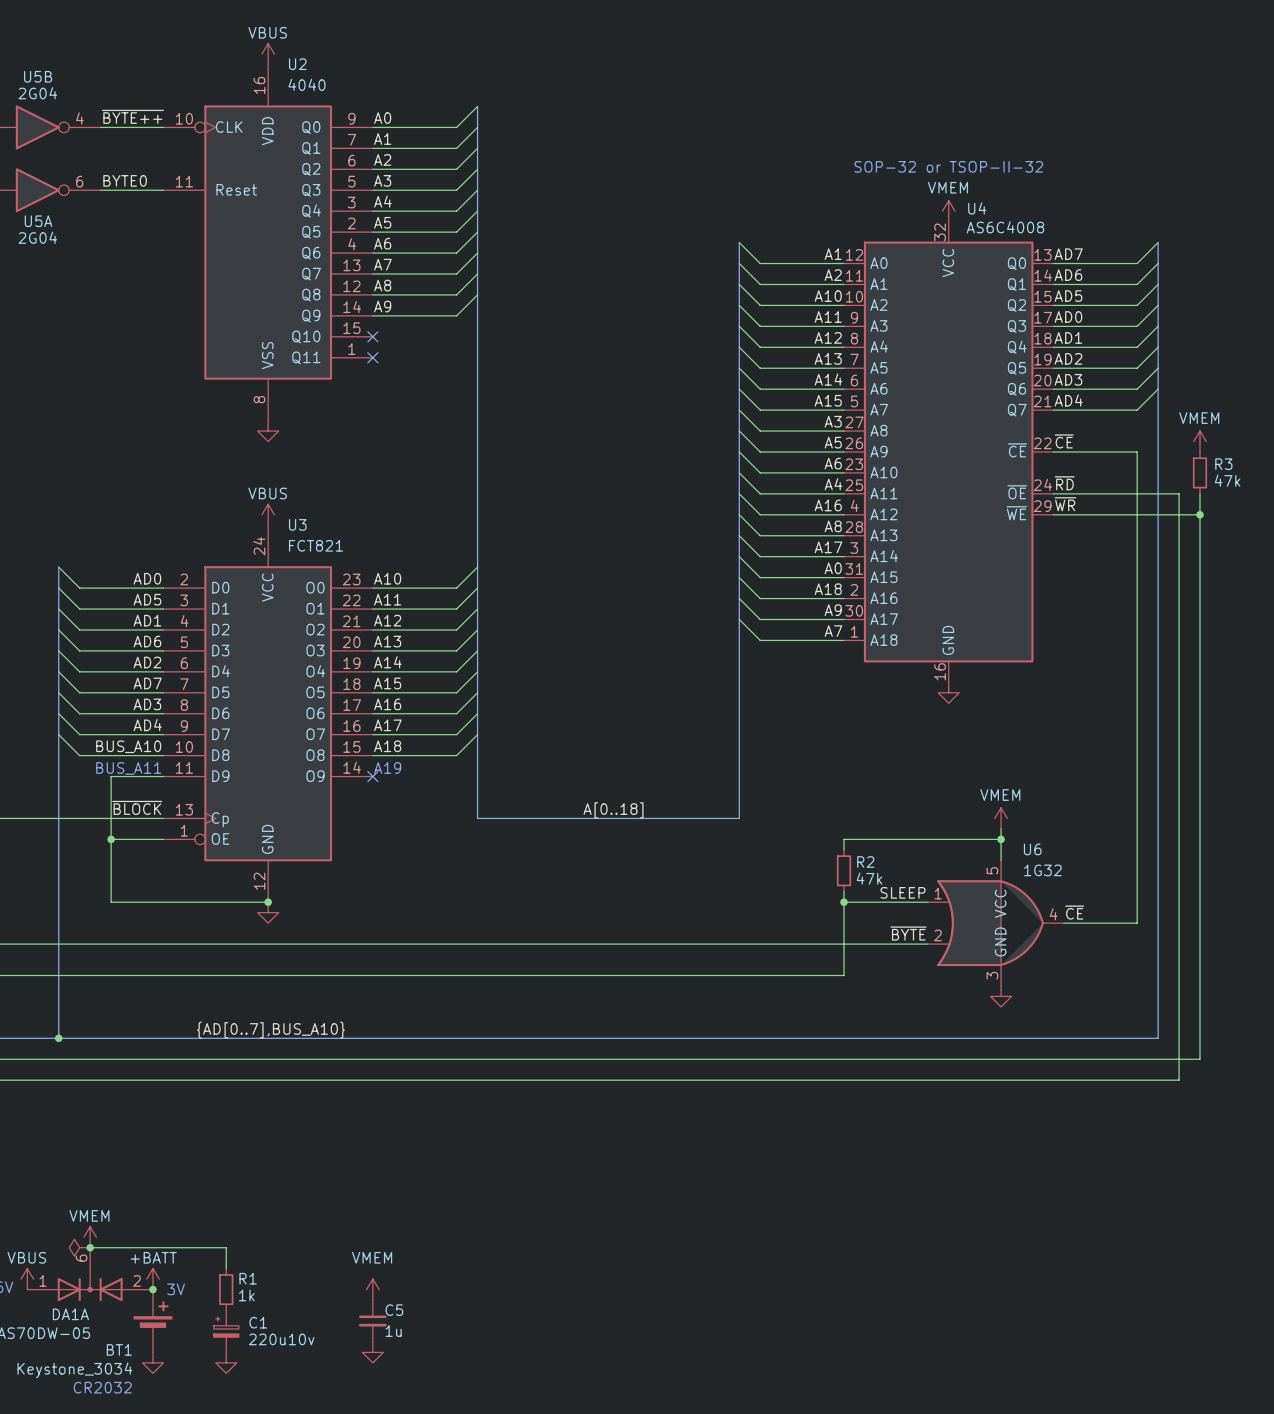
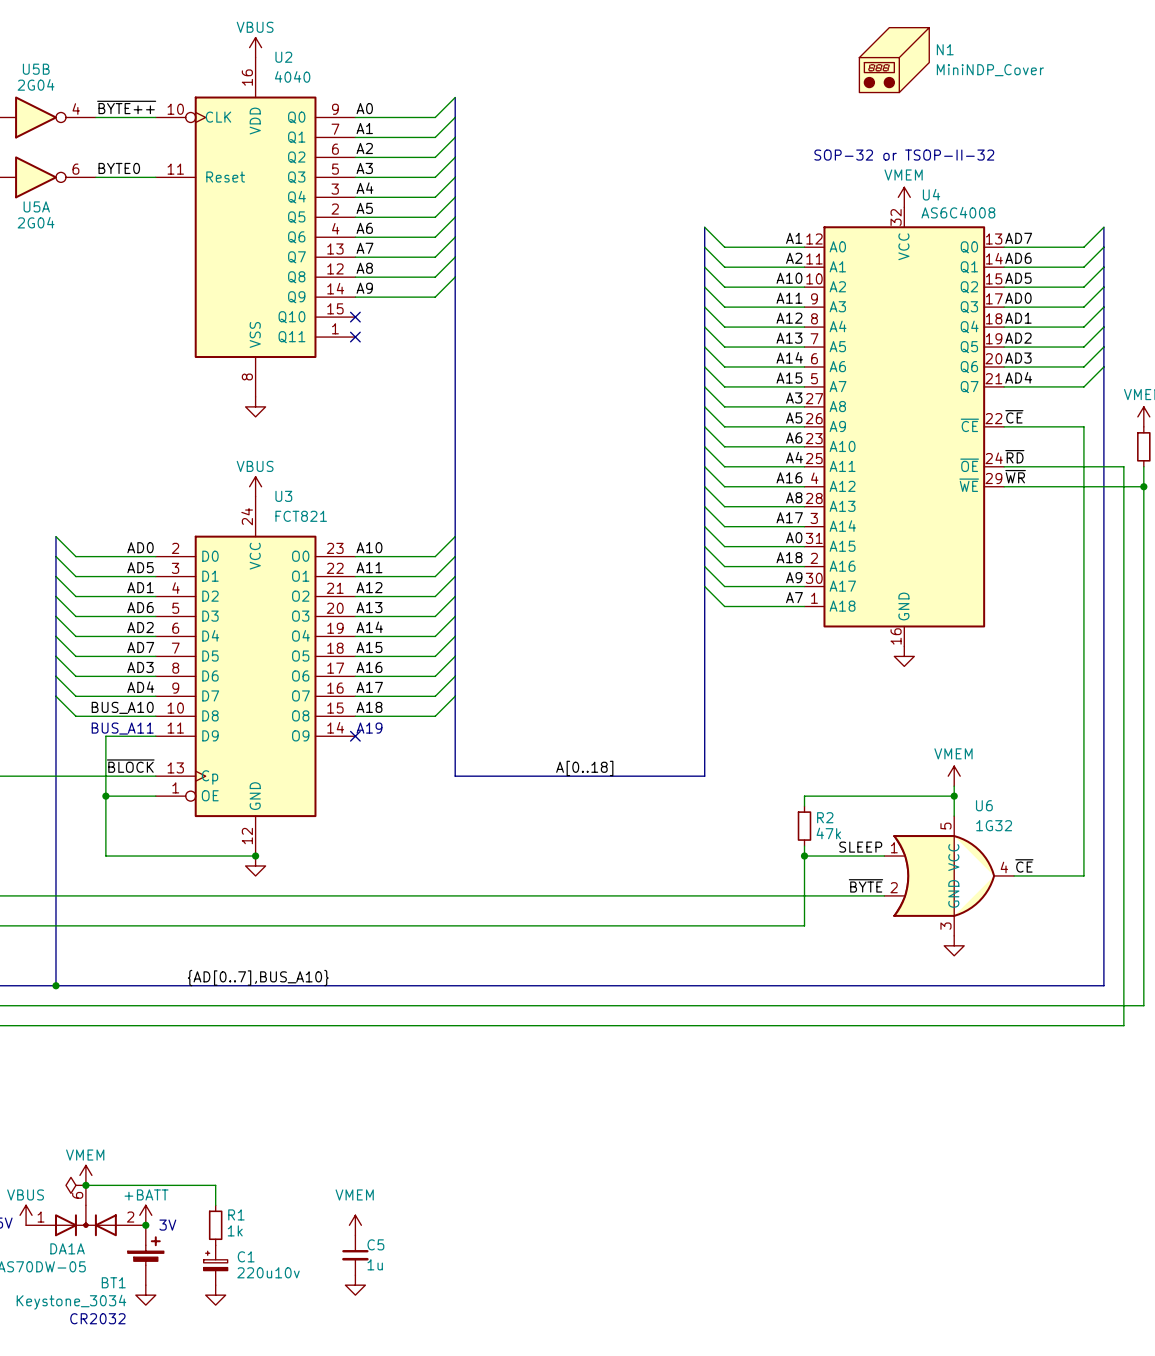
N1: none -> MiniNDP_Cover (894, 60)

